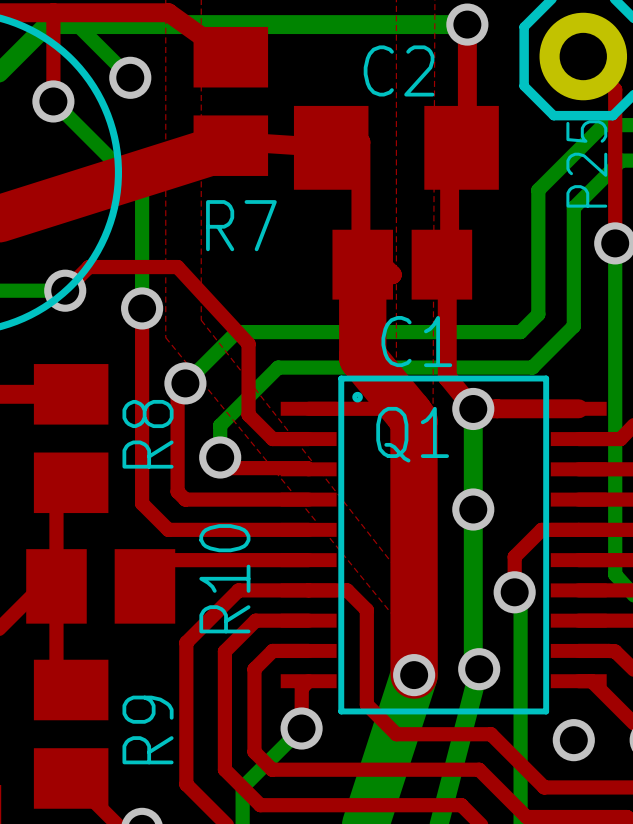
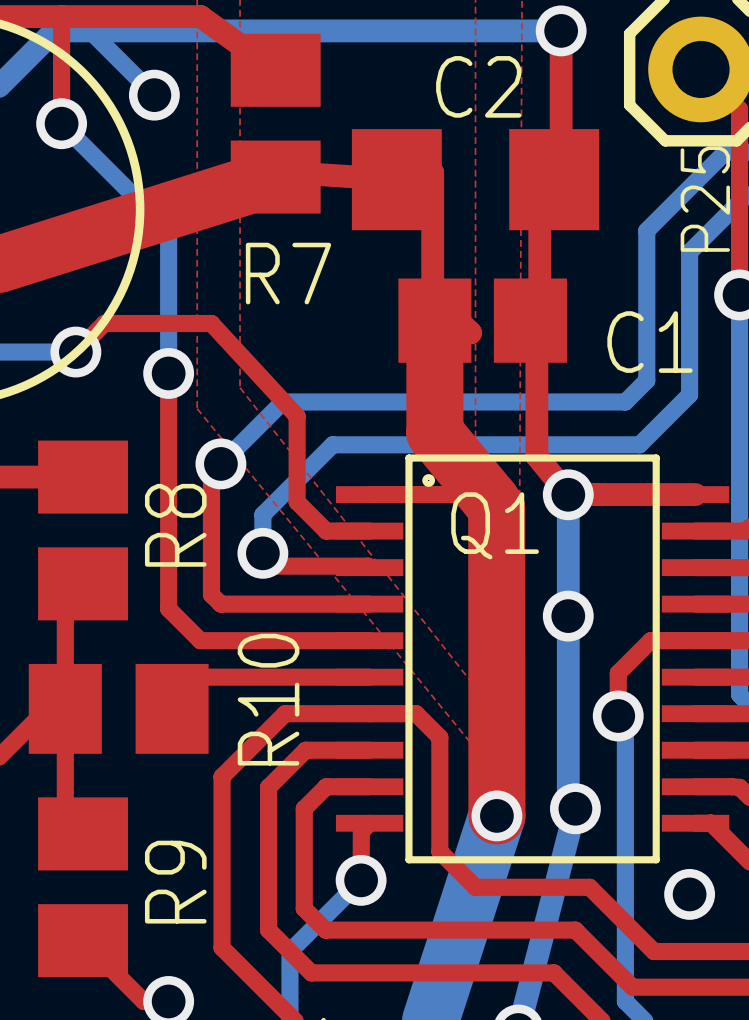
C1 name position: C1 (416, 341) -> C1 (650, 342)

